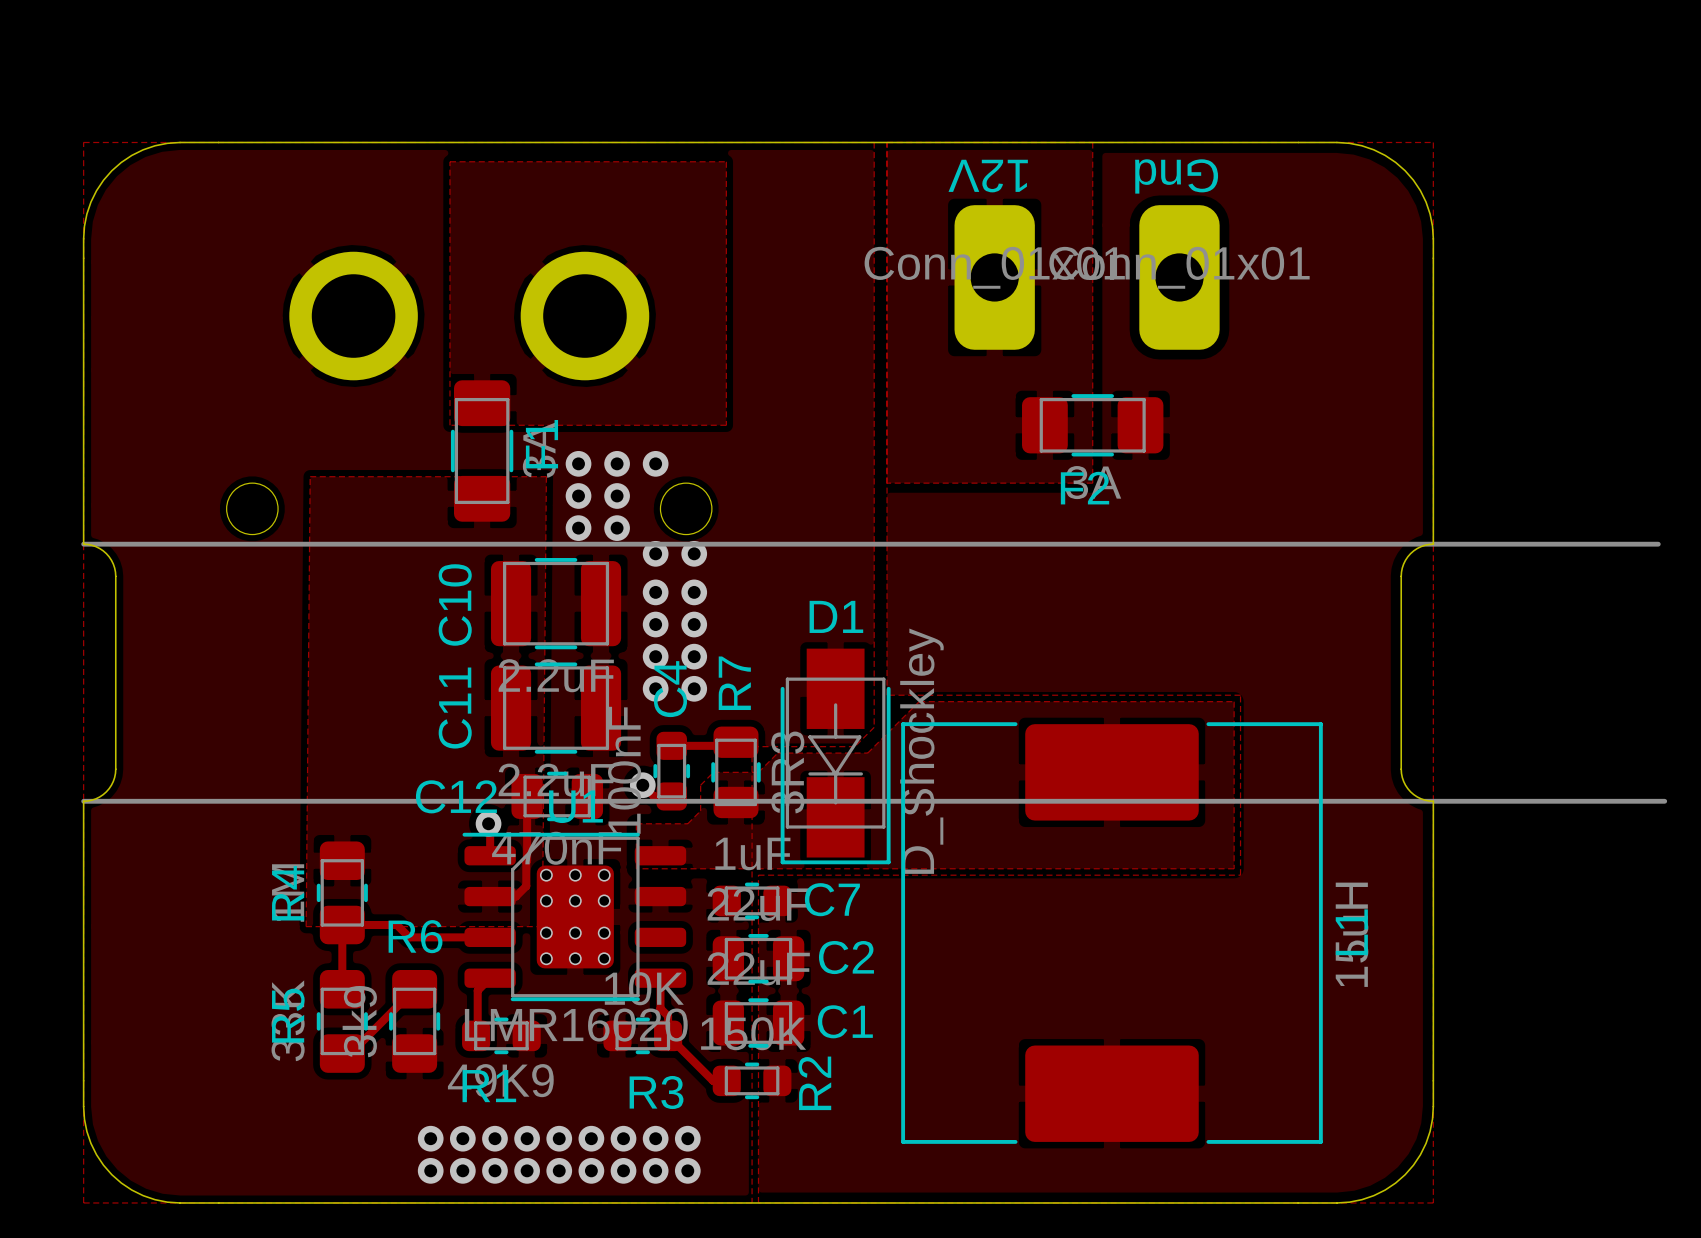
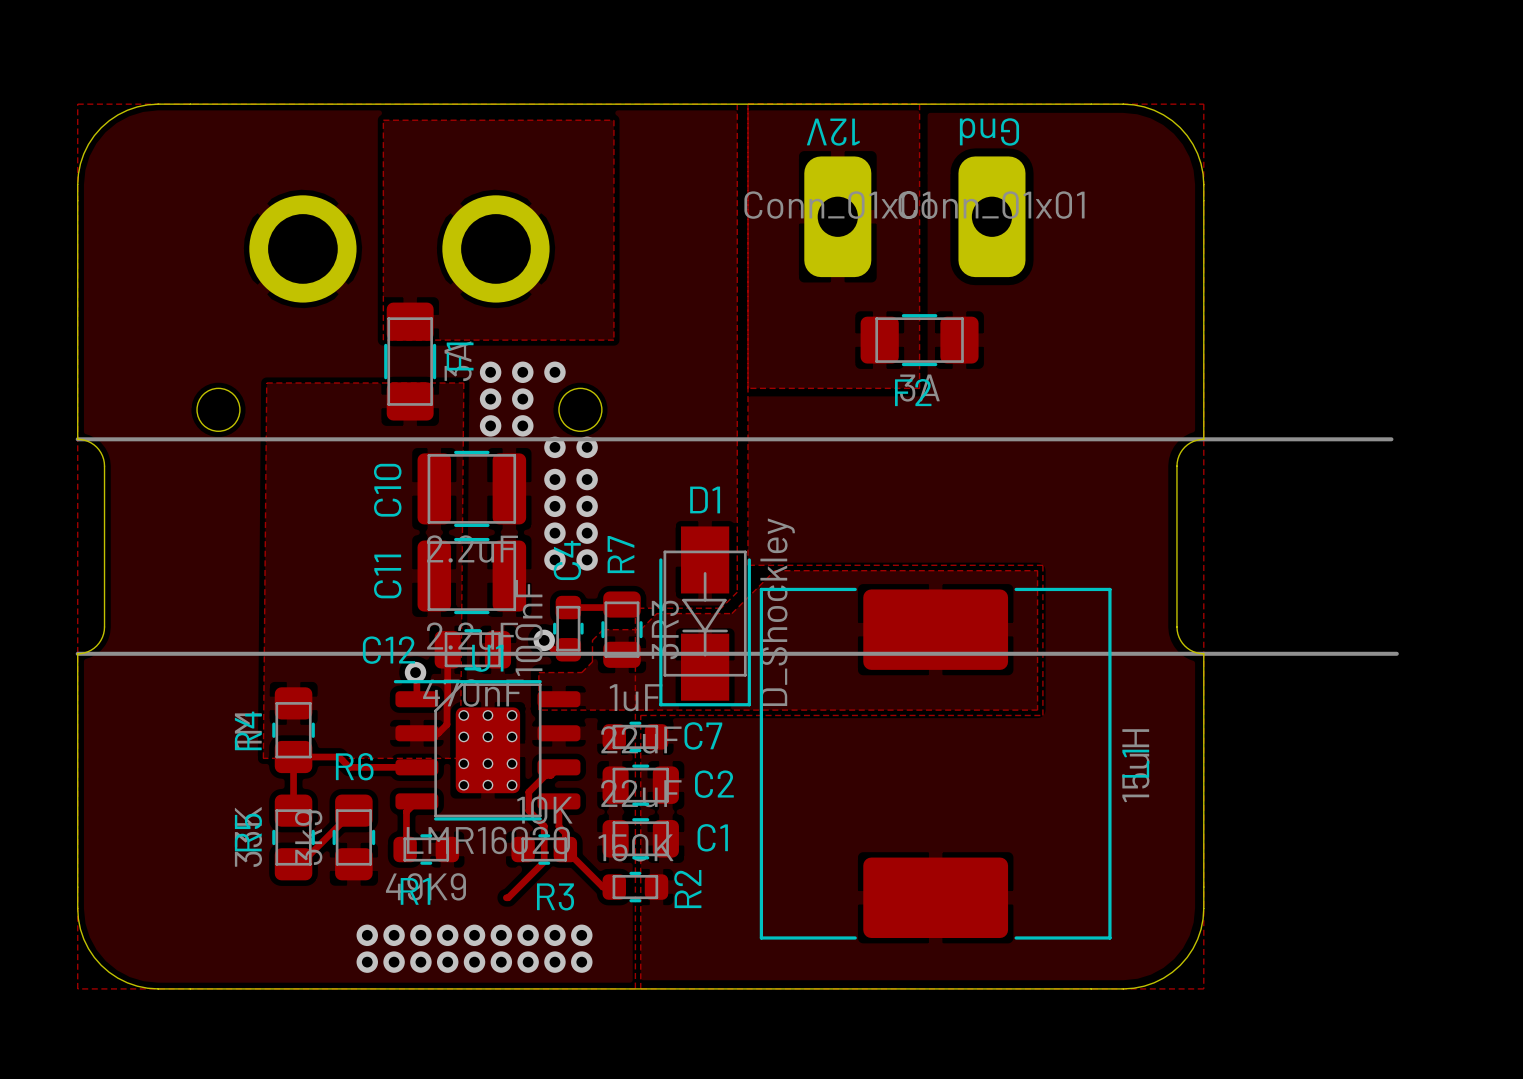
track: none -> (558, 767) (550, 775) (545, 775) (528, 792) (528, 810) (544, 826) (544, 861) (506, 897)

